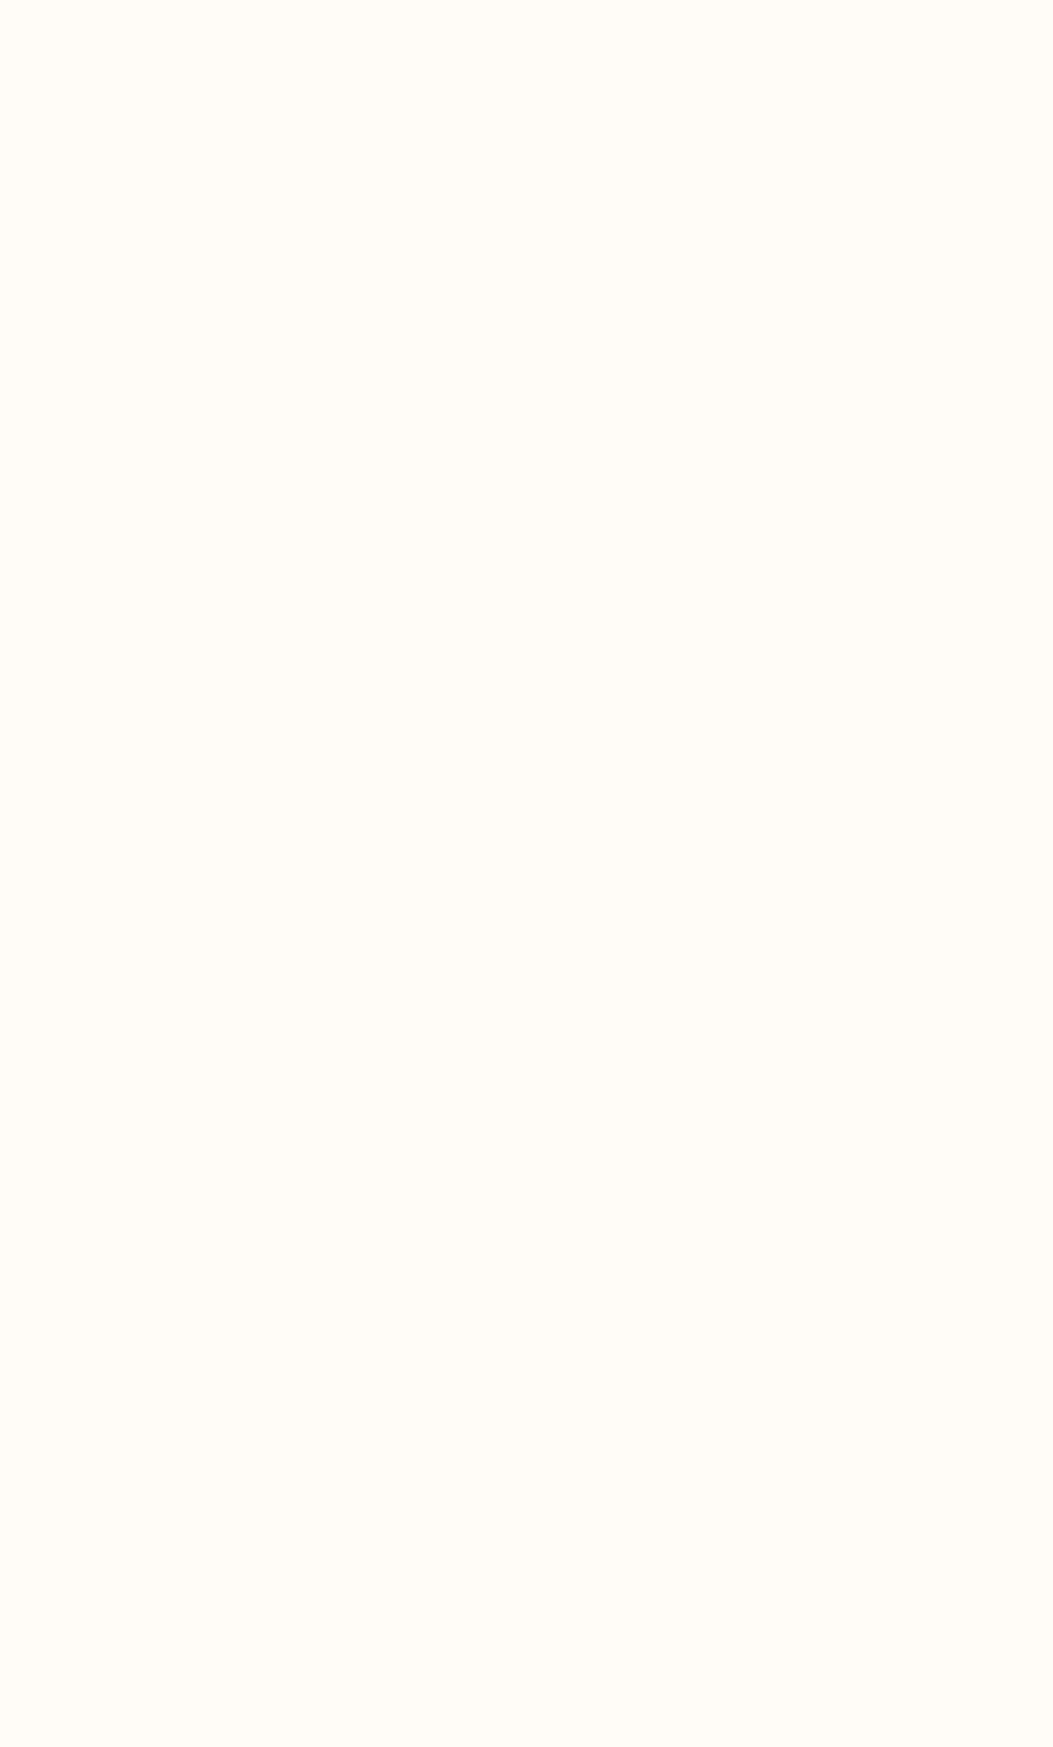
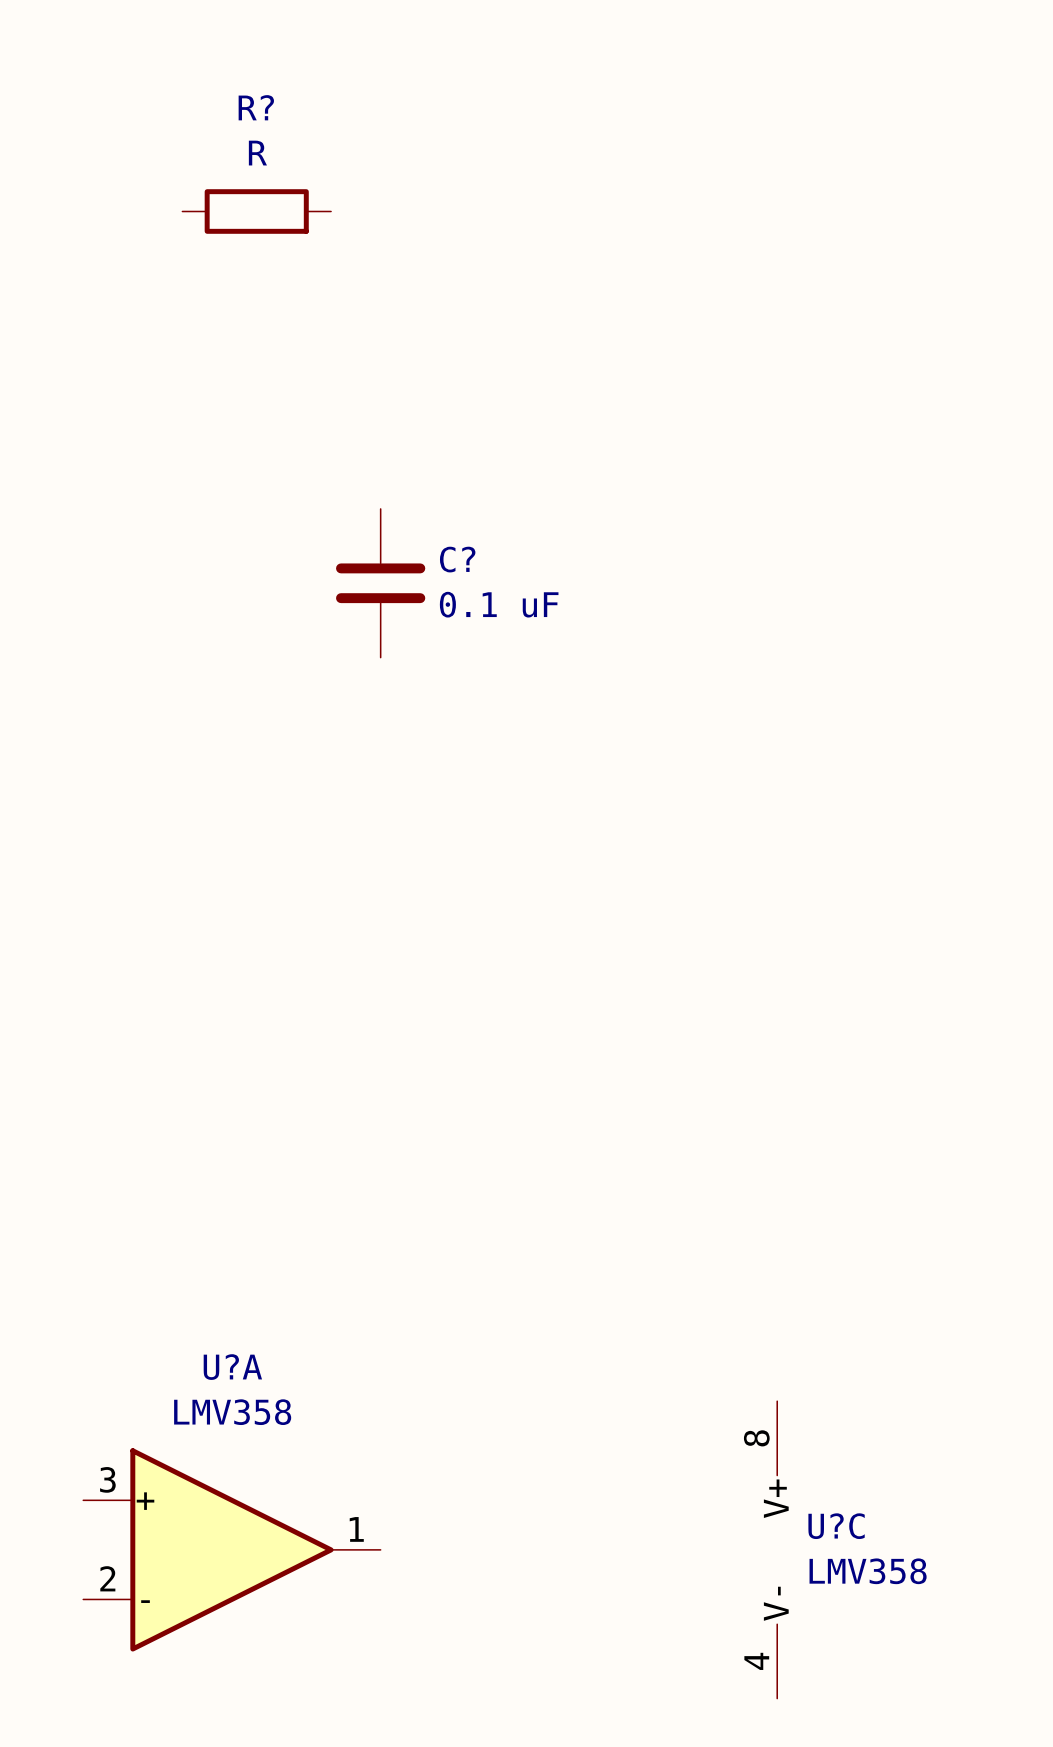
R?: none -> R (256, 211)
C?: none -> 0.1 uF (380, 583)
U?A: none -> LMV358 (231, 1549)
U?C: none -> LMV358 (777, 1549)

